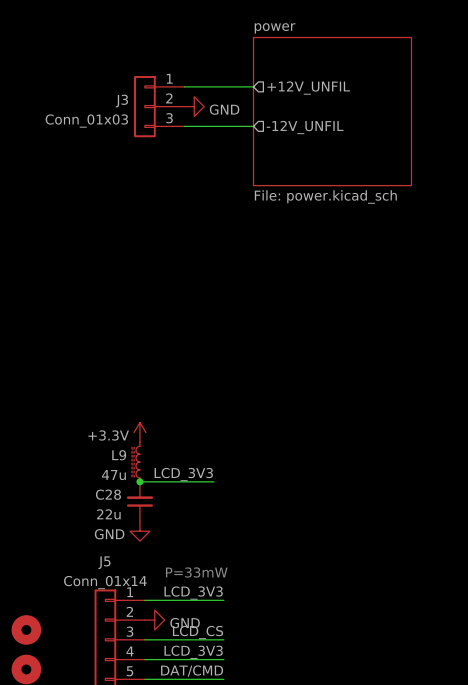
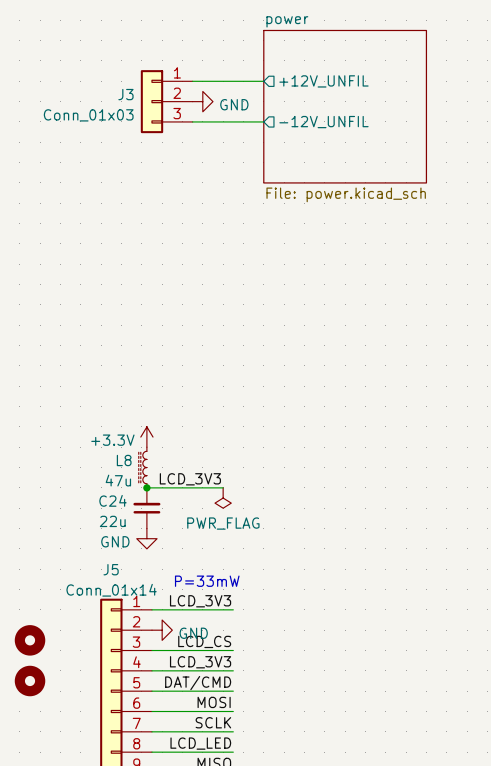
L9 name: L9 (119, 455) -> L8 (124, 460)
power symbol: none -> PWR_FLAG (223, 498)
C28 name: C28 (108, 494) -> C24 (112, 500)

